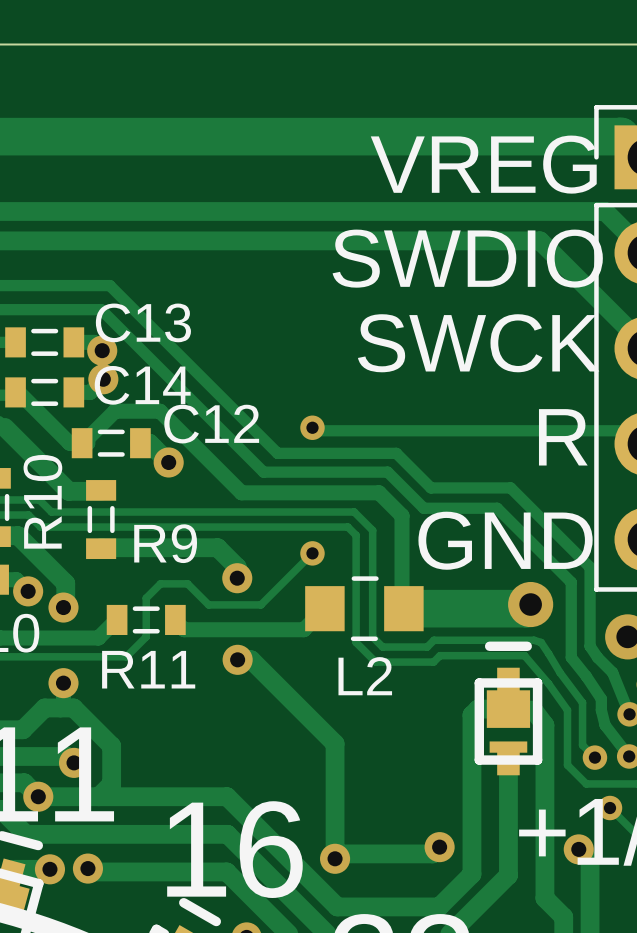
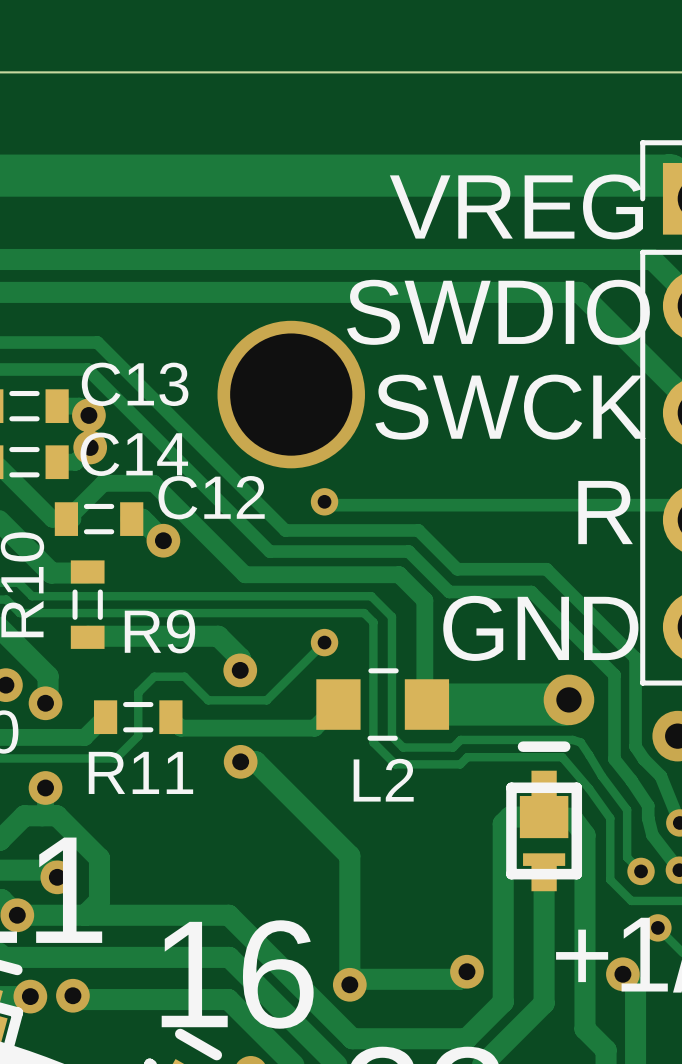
via: none -> (291, 394)

